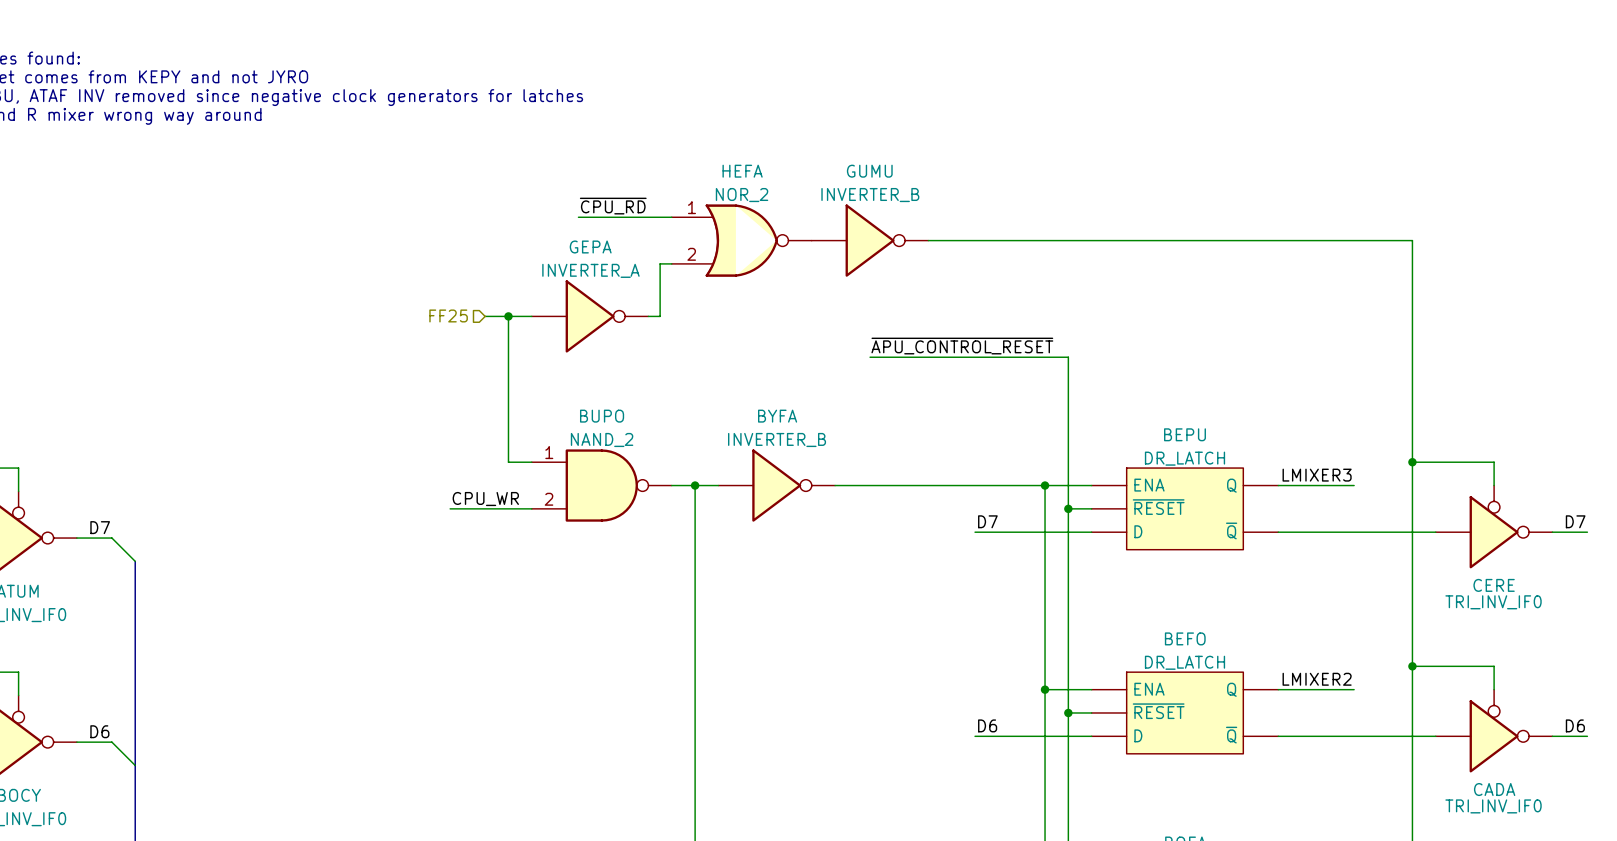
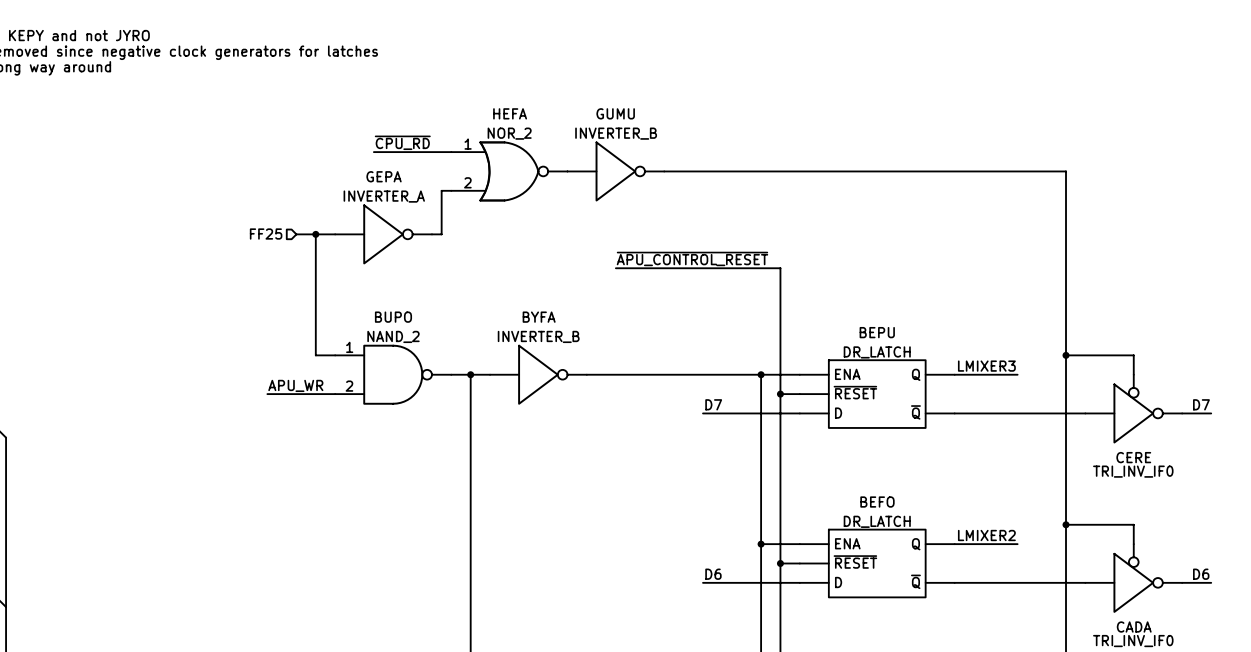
label: CPU_WR (485, 499) -> APU_WR (295, 385)

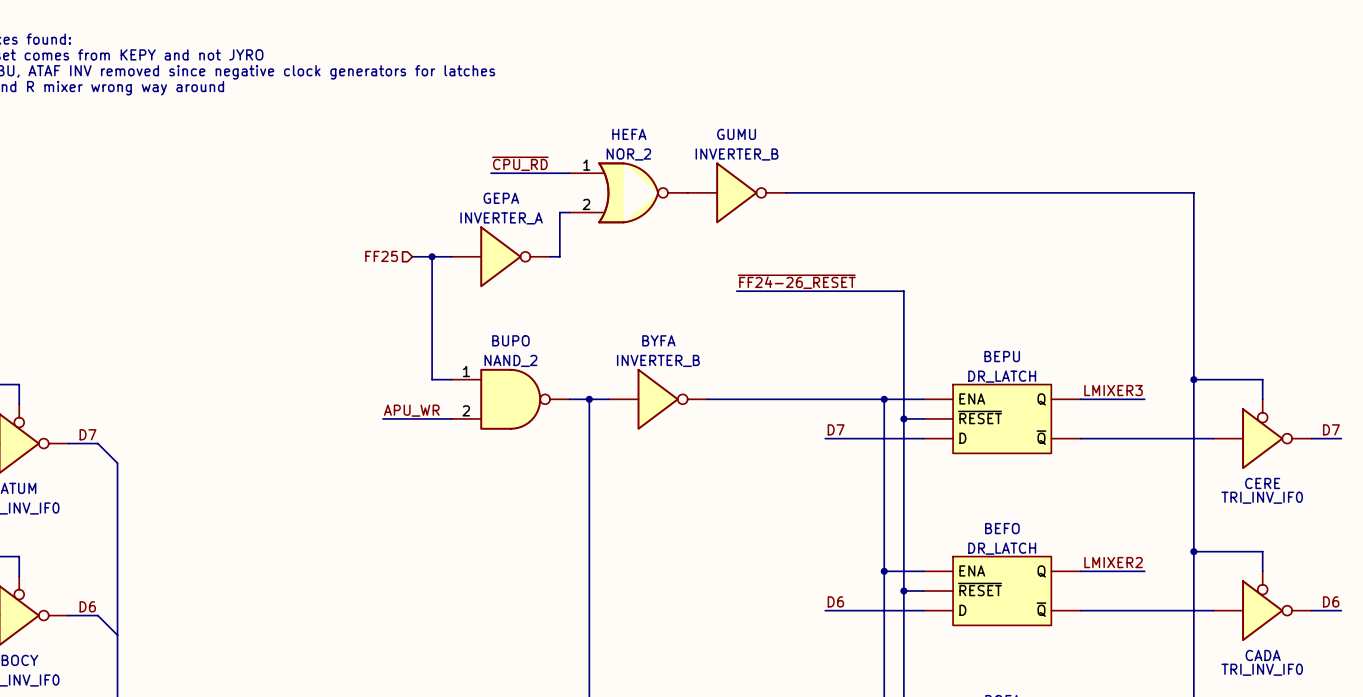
label: ~{APU_CONTROL_RESET} (692, 258) -> ~{FF24-26_RESET} (796, 281)

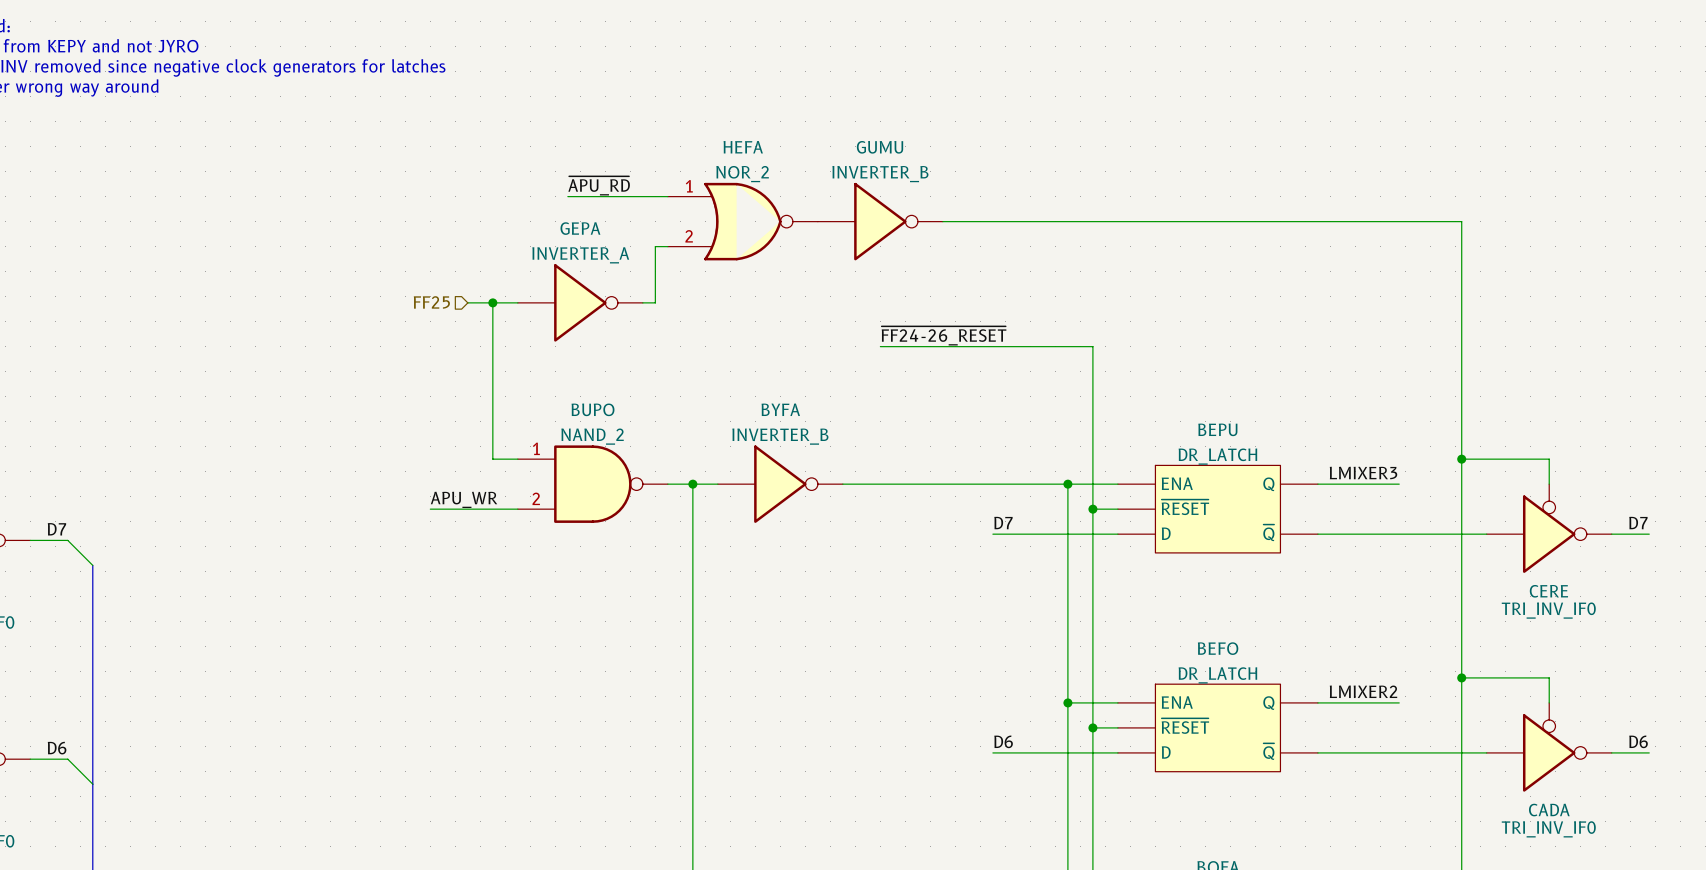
label: ~{CPU_RD} (520, 163) -> ~{APU_RD} (599, 185)

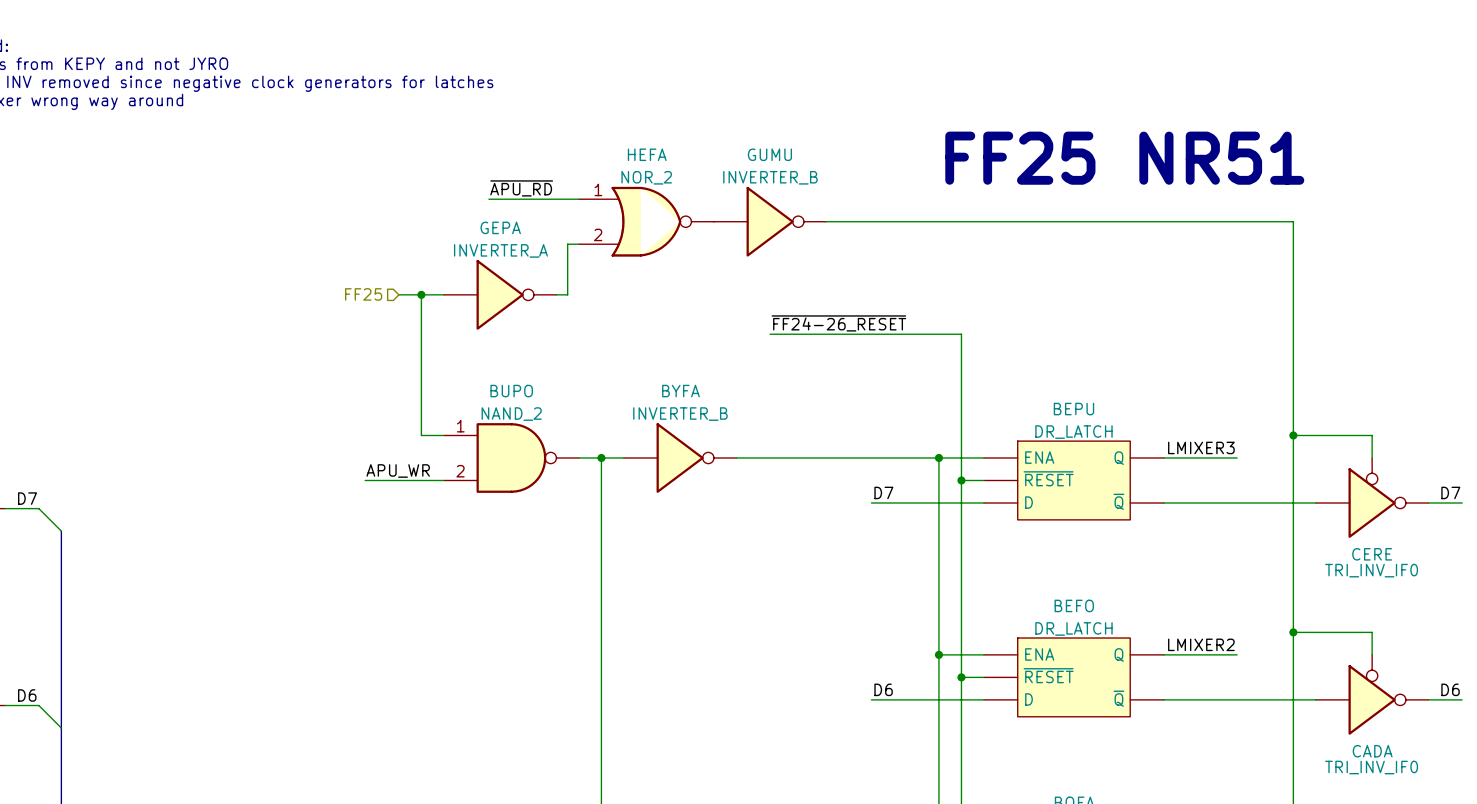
text: none -> FF25 NR51 (1124, 158)

